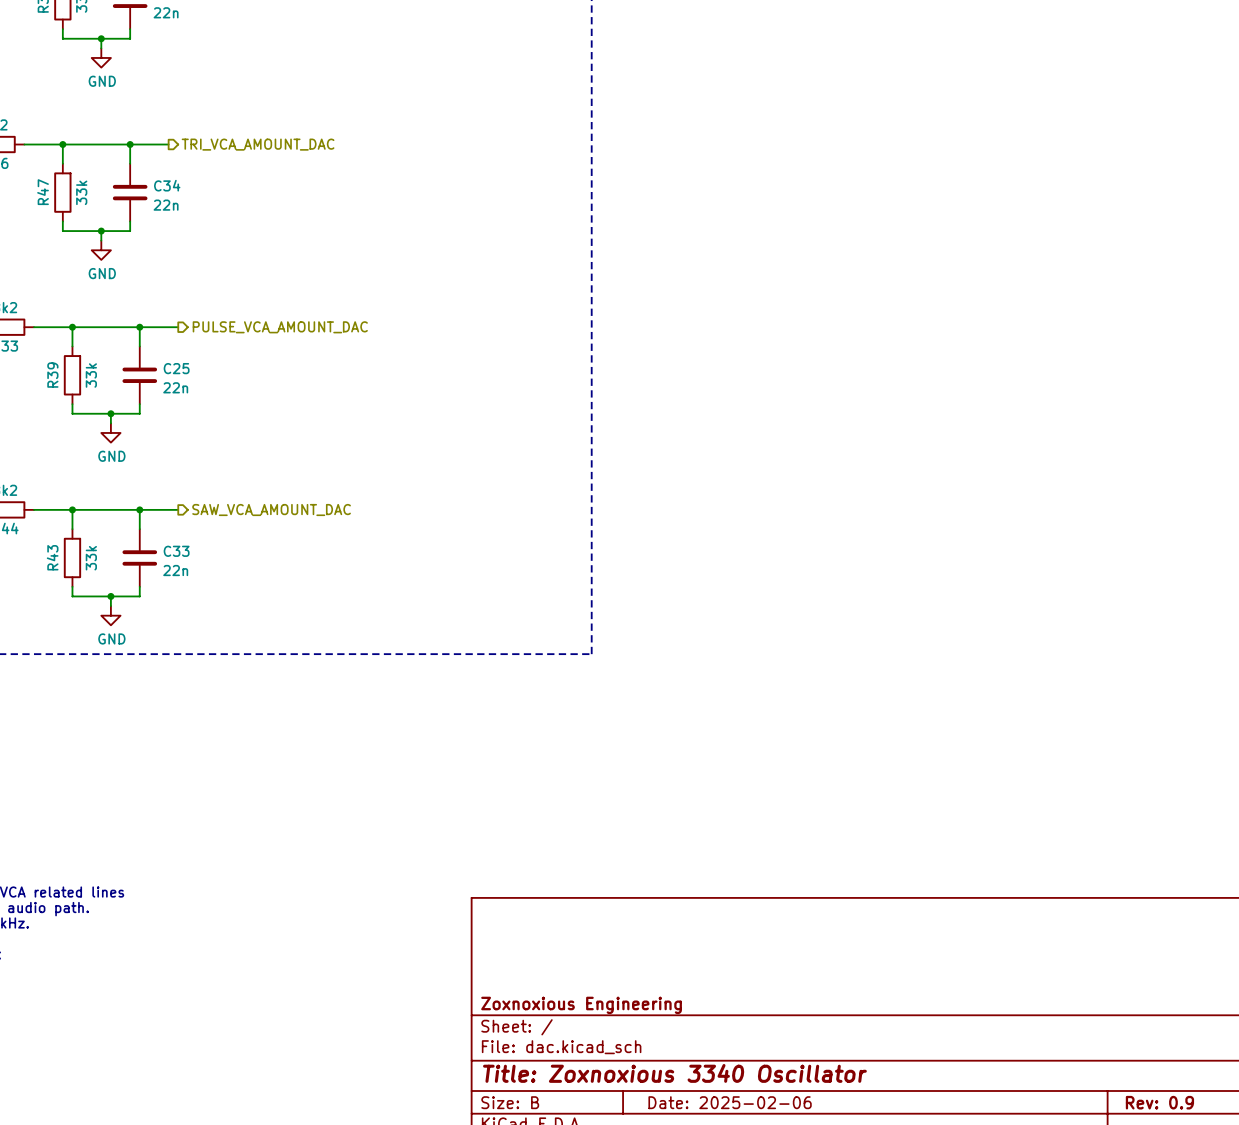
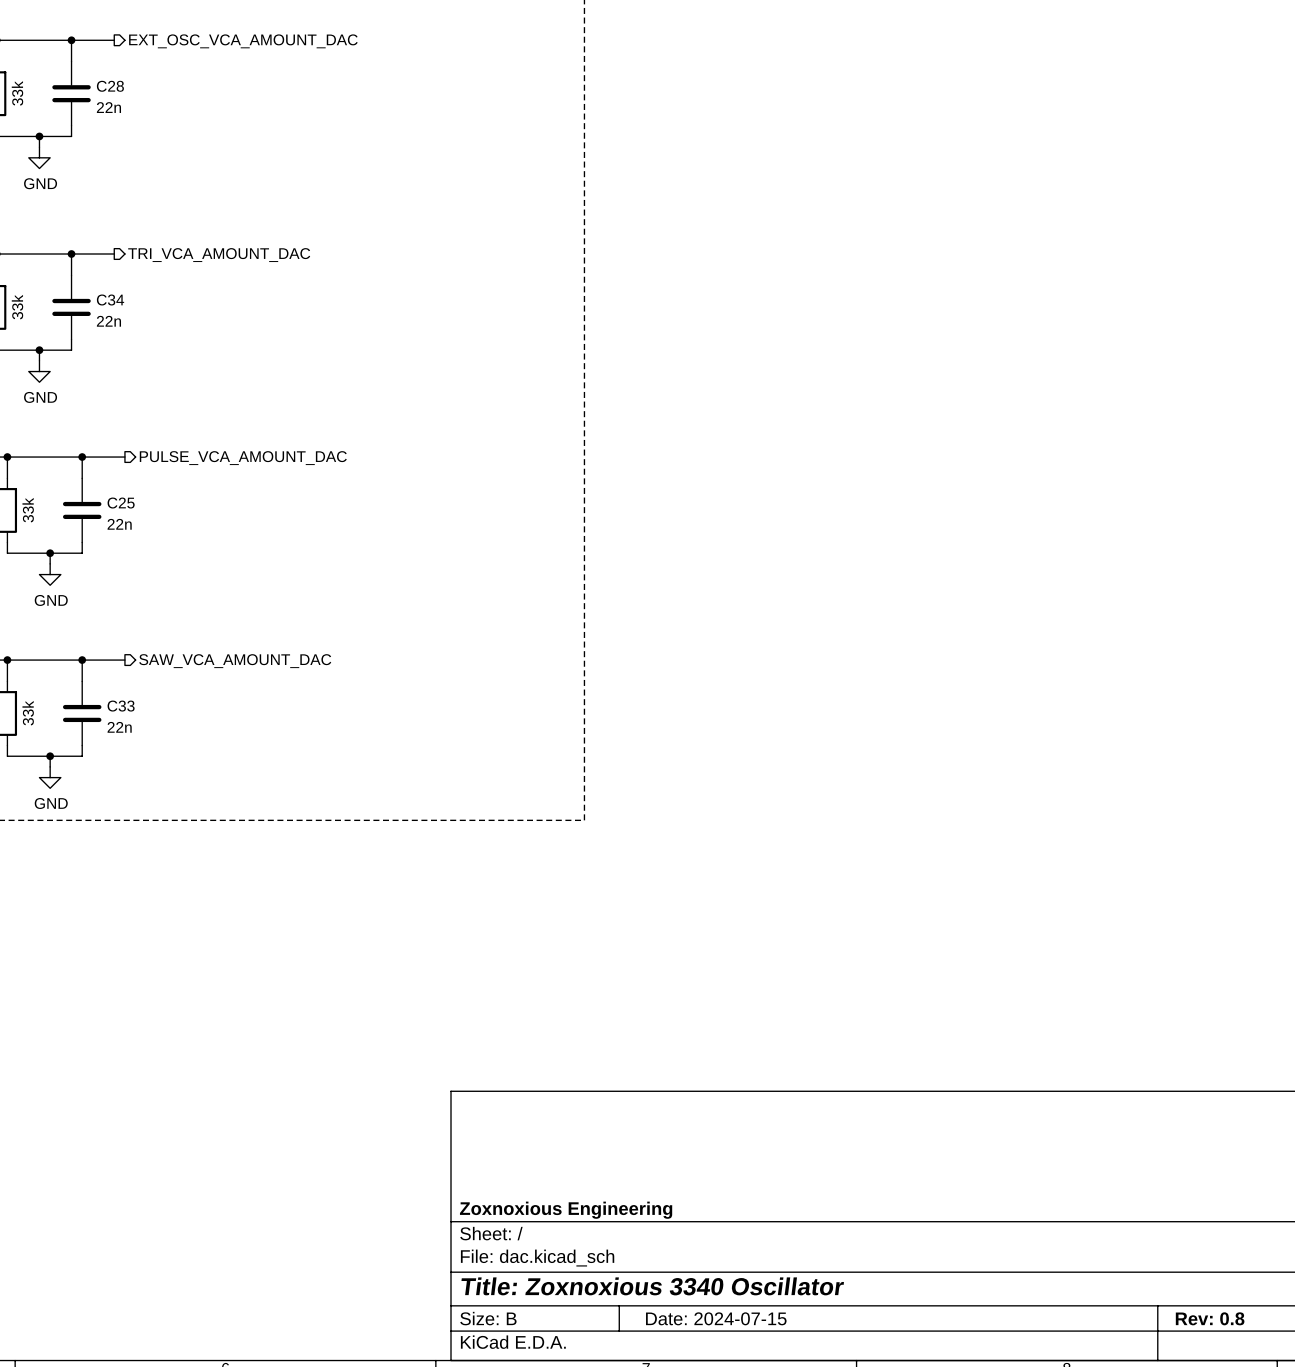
title block: Date: 2025-02-06 (730, 1102) -> Date: 2024-07-15 (716, 1318)
title block: Rev: 0.9 (1159, 1102) -> Rev: 0.8 (1210, 1318)

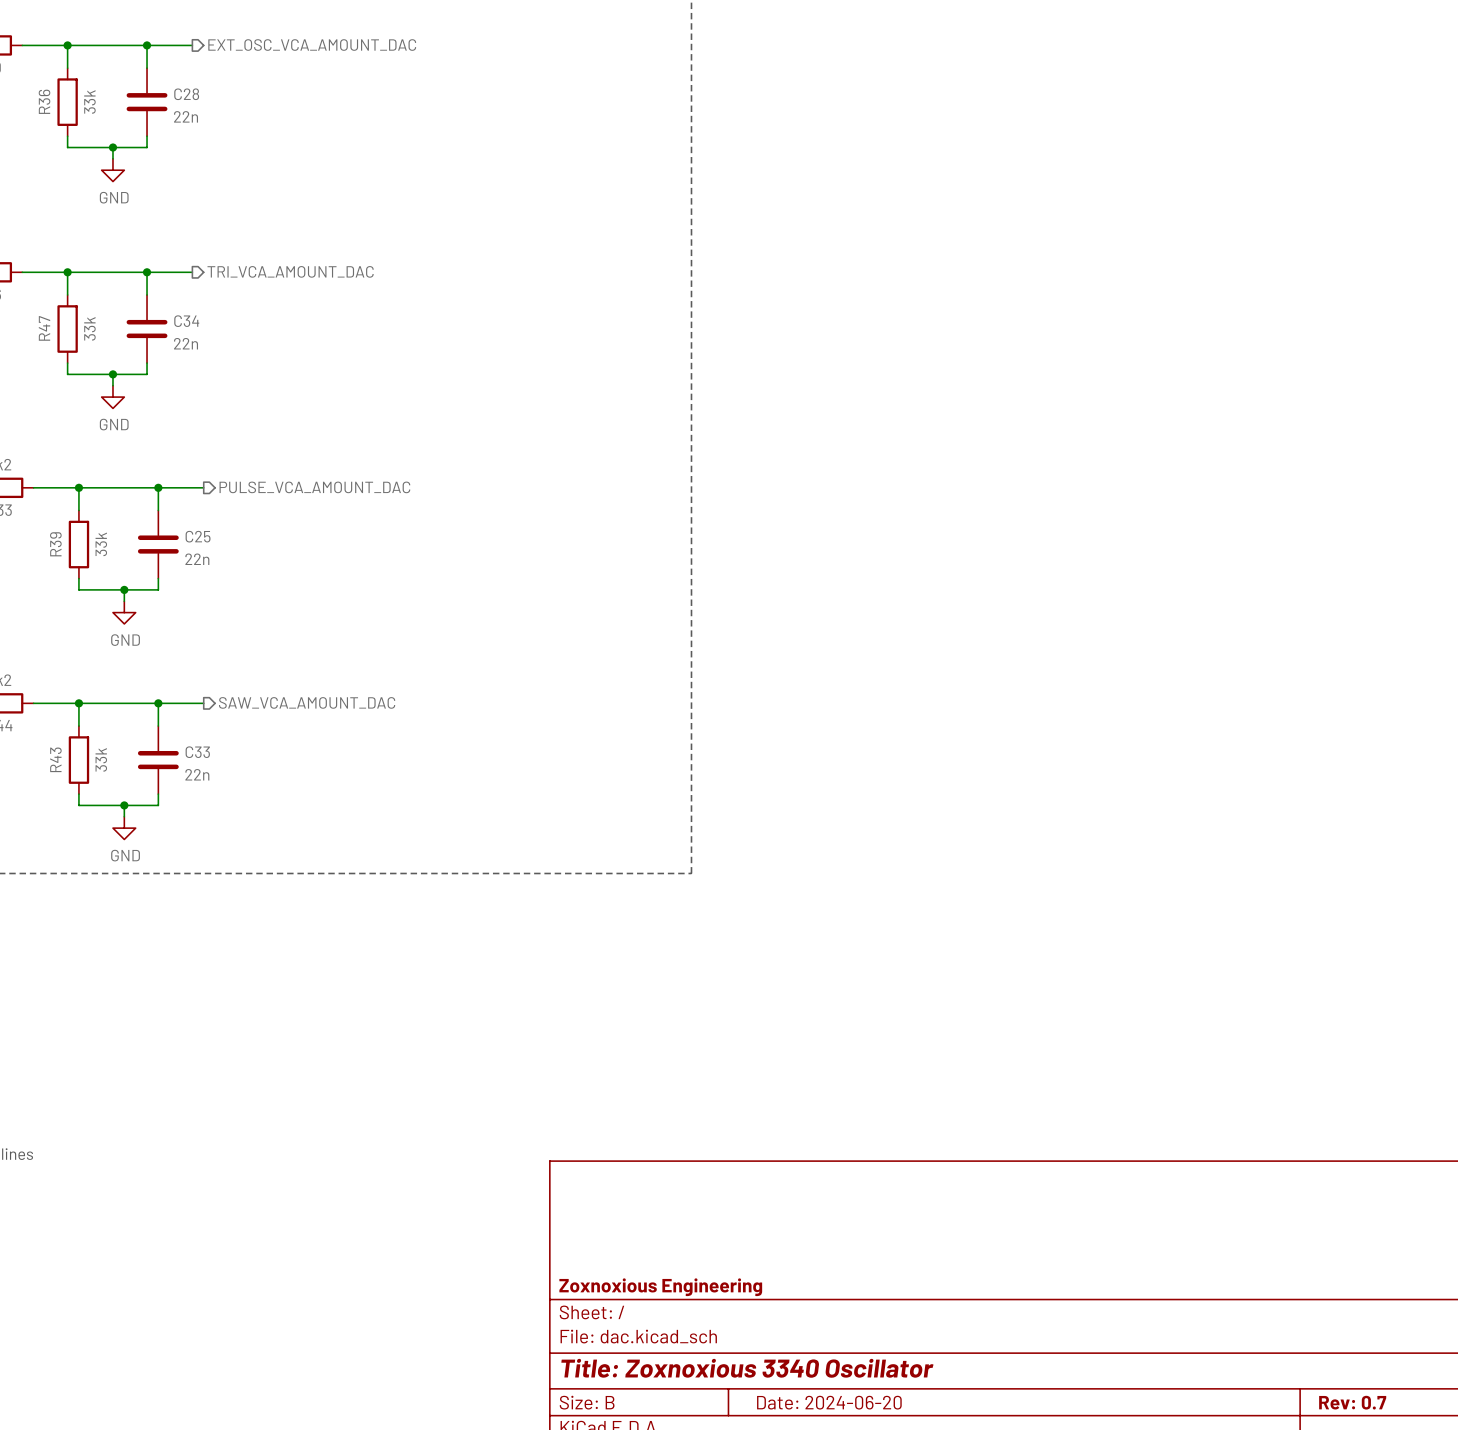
title block: Date: 2024-07-15 (716, 1318) -> Date: 2024-06-20 (829, 1402)
title block: Rev: 0.8 (1210, 1318) -> Rev: 0.7 (1352, 1402)

